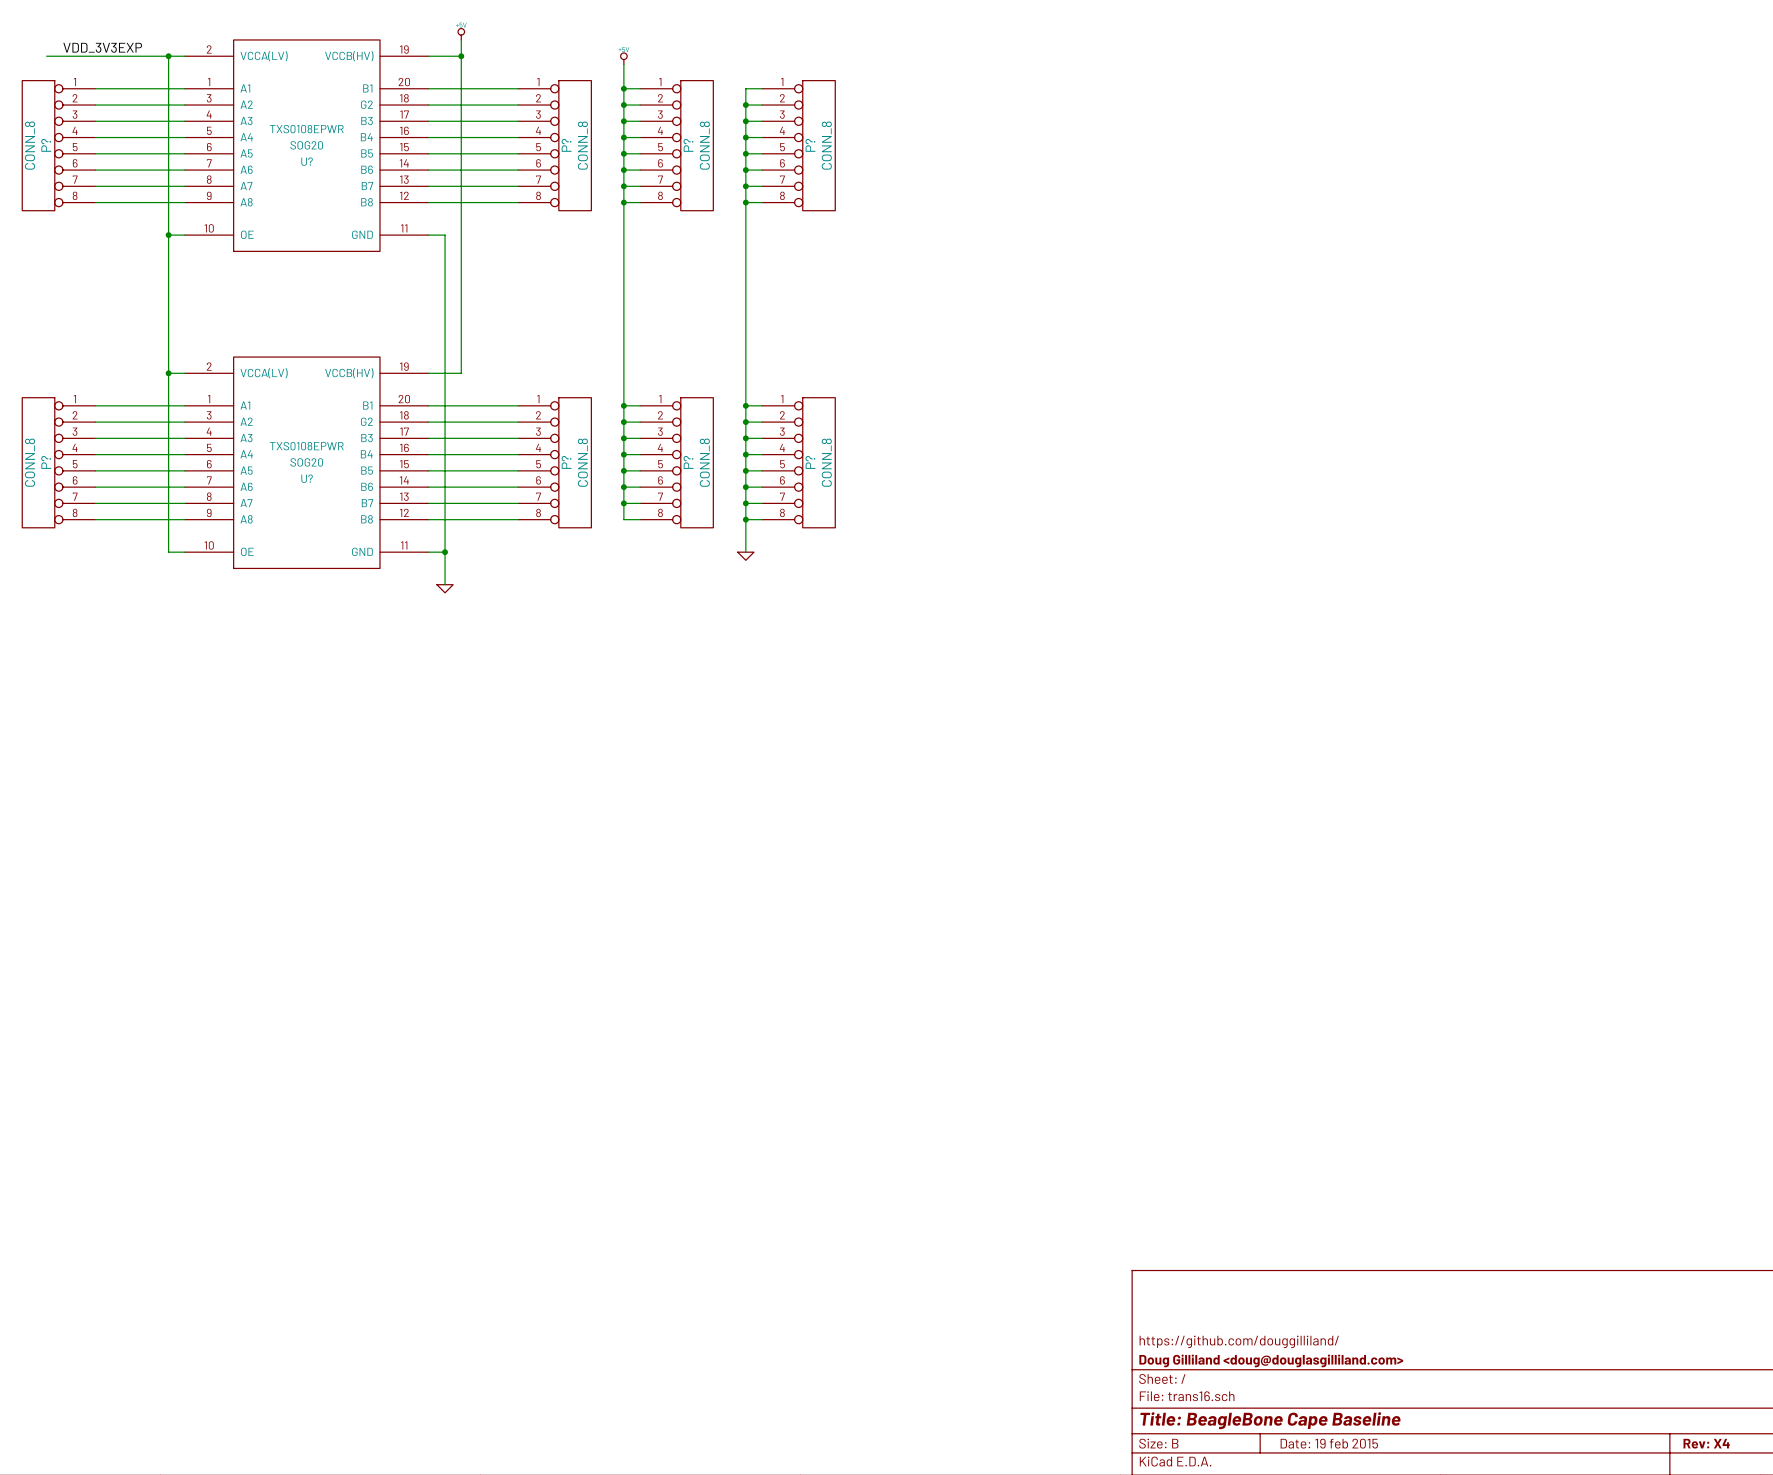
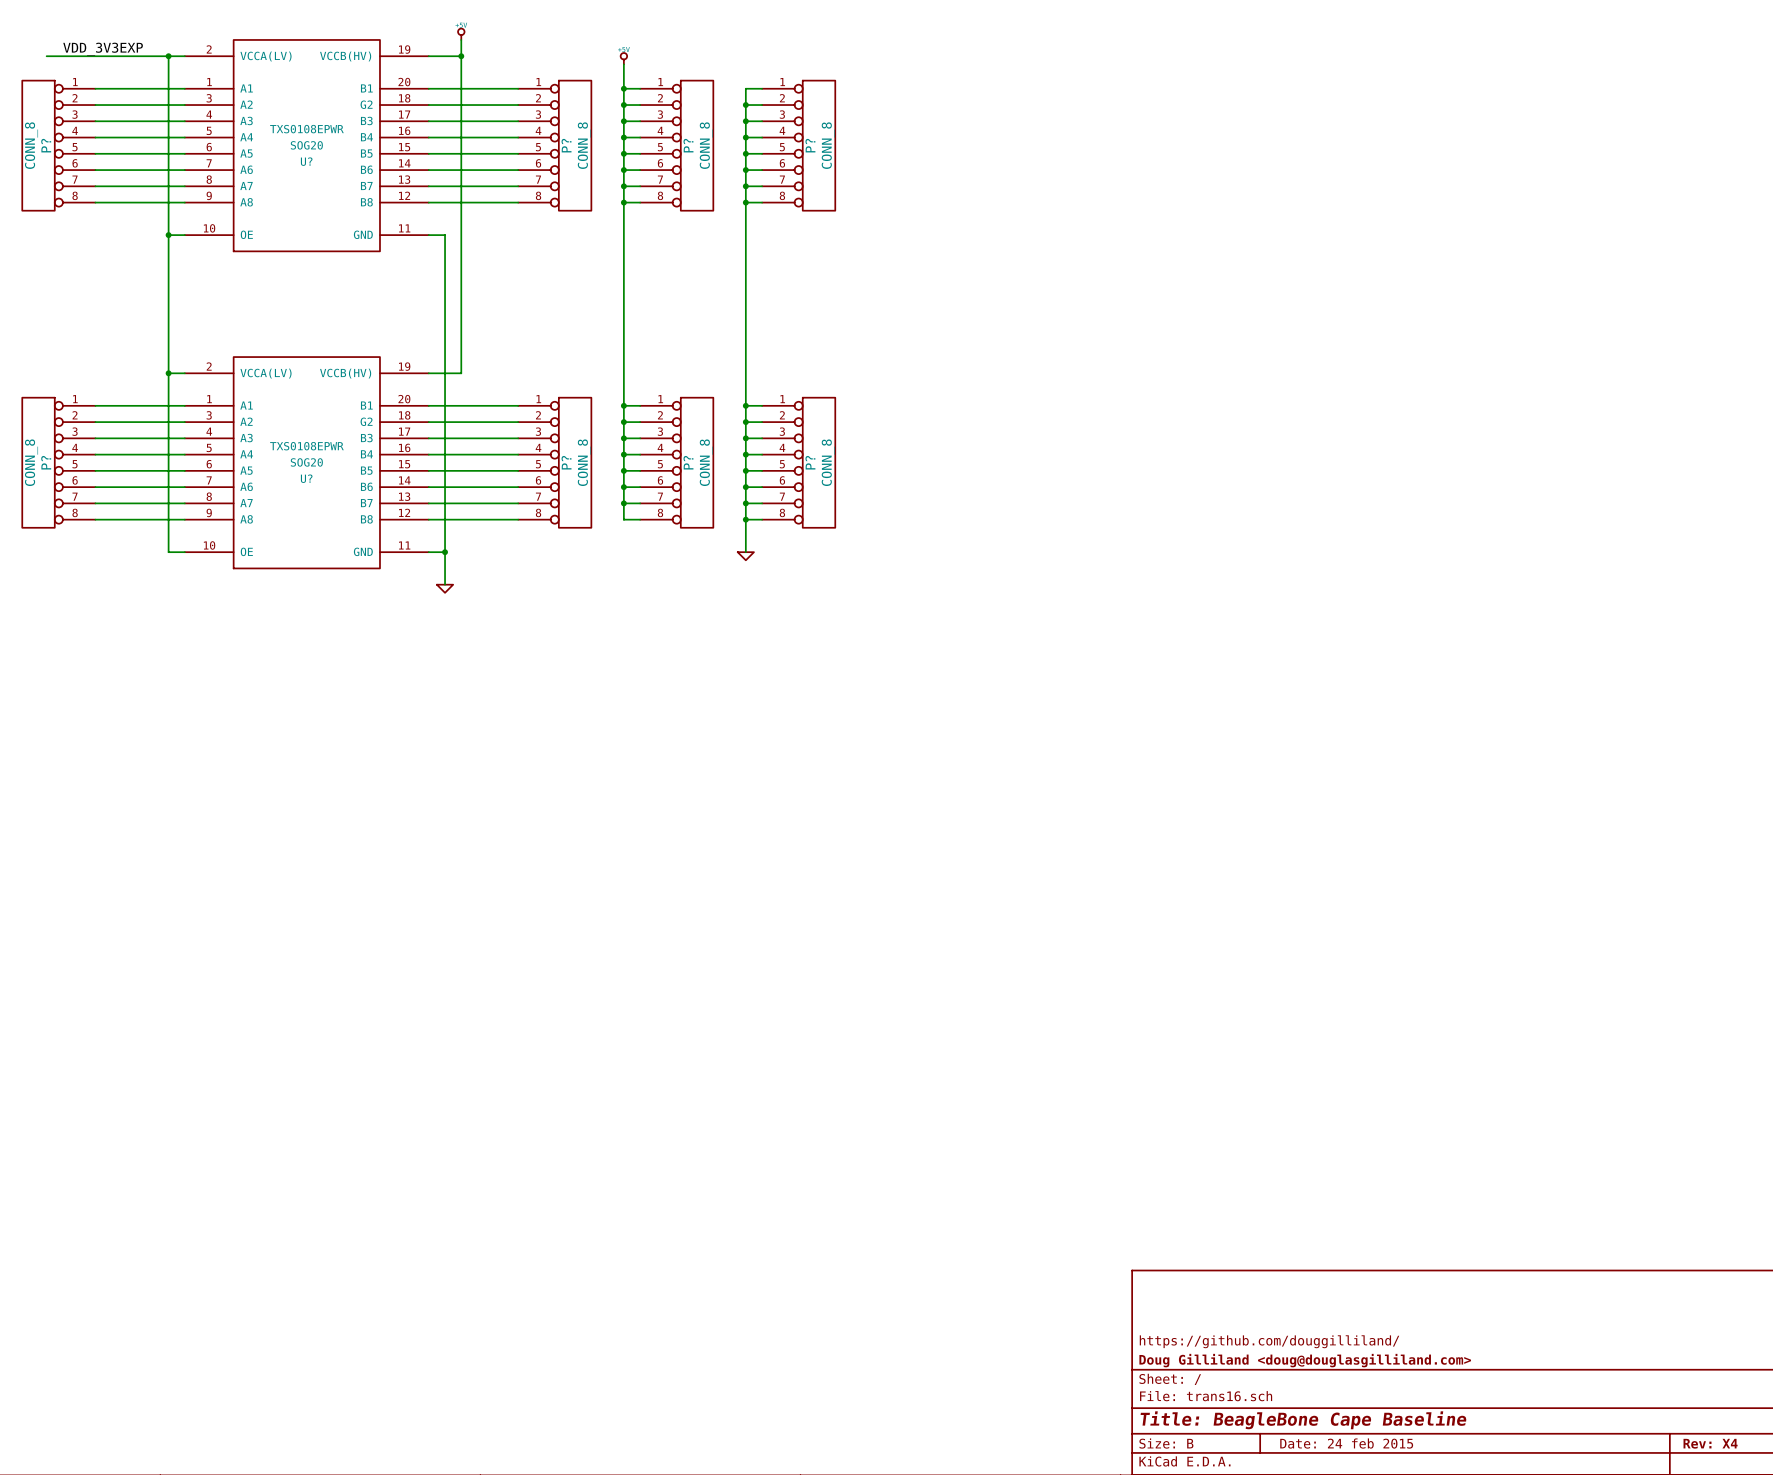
title block: Date: 19 feb 2015 (1329, 1443) -> Date: 24 feb 2015 (1346, 1443)

